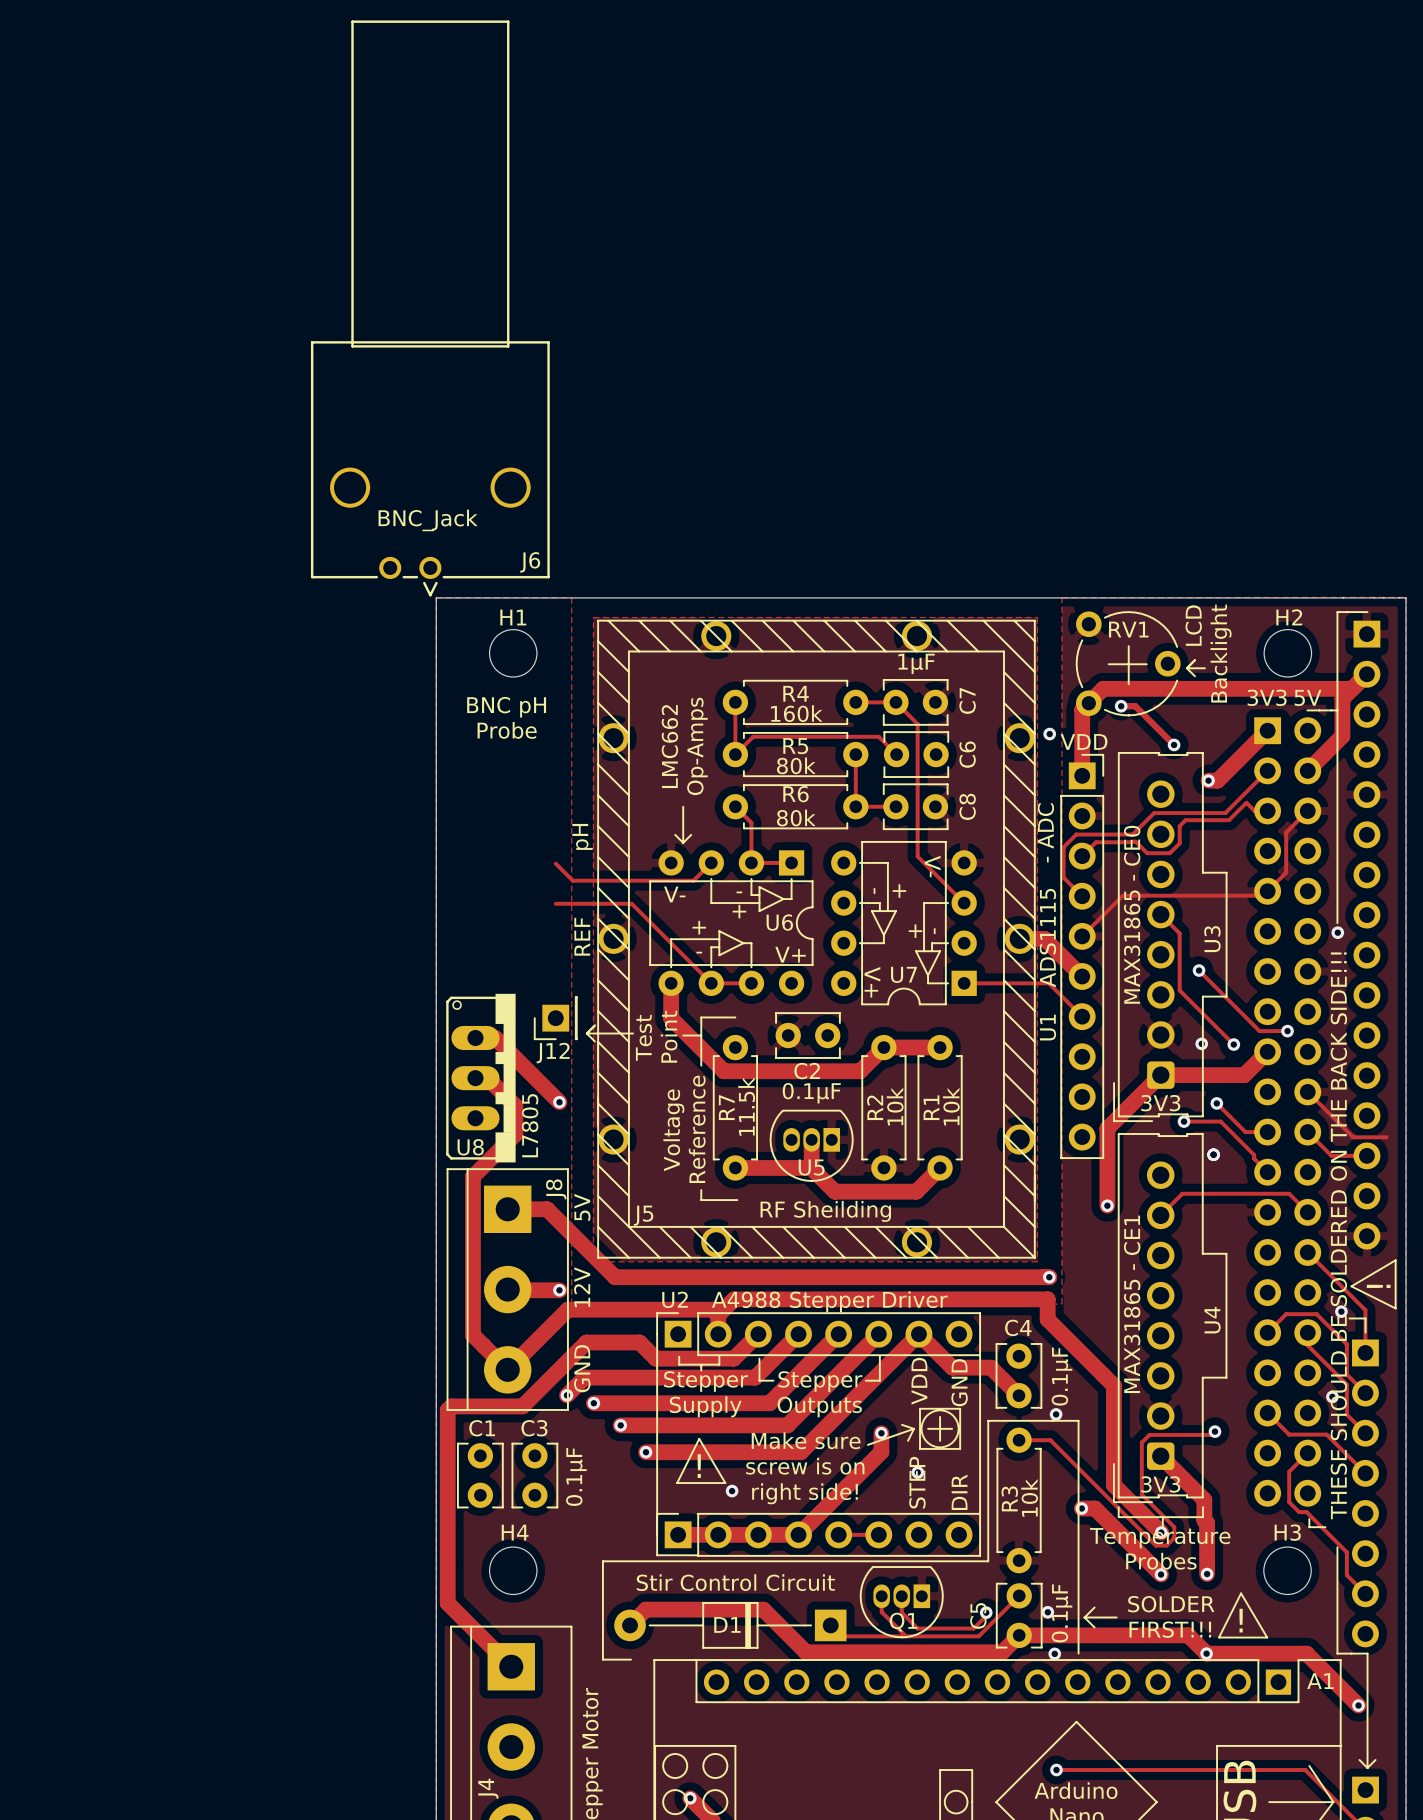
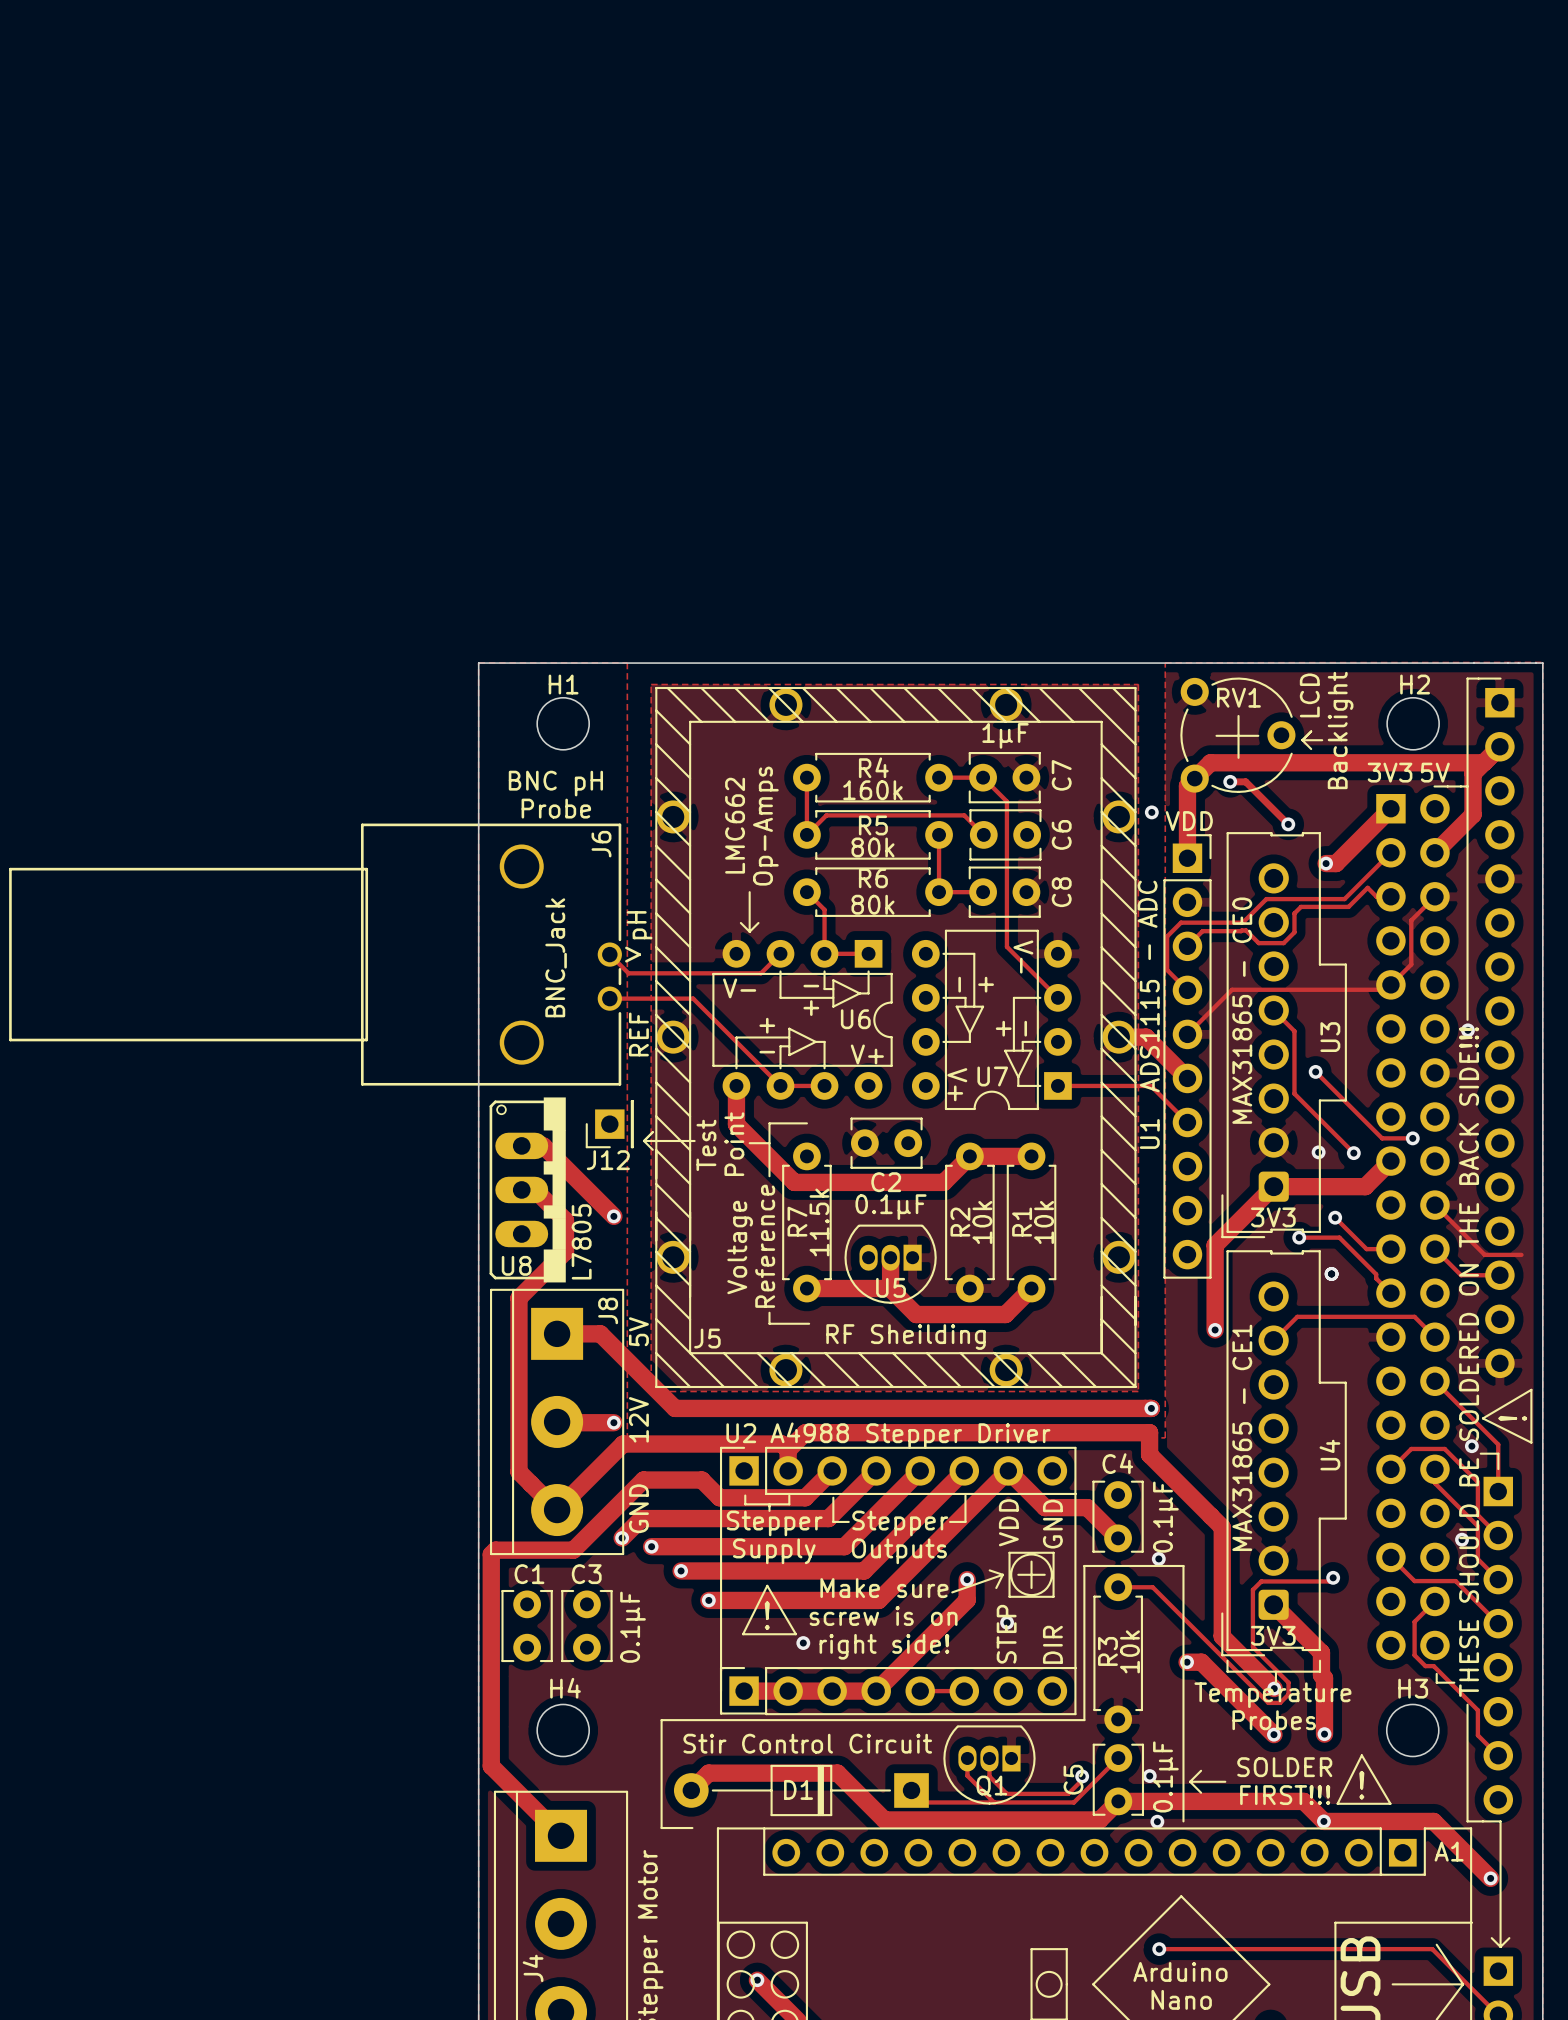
J6 rotation: 0° (430, 308) -> 90° counterclockwise (325, 954)
J6 position: (430, 308) -> (325, 954)

